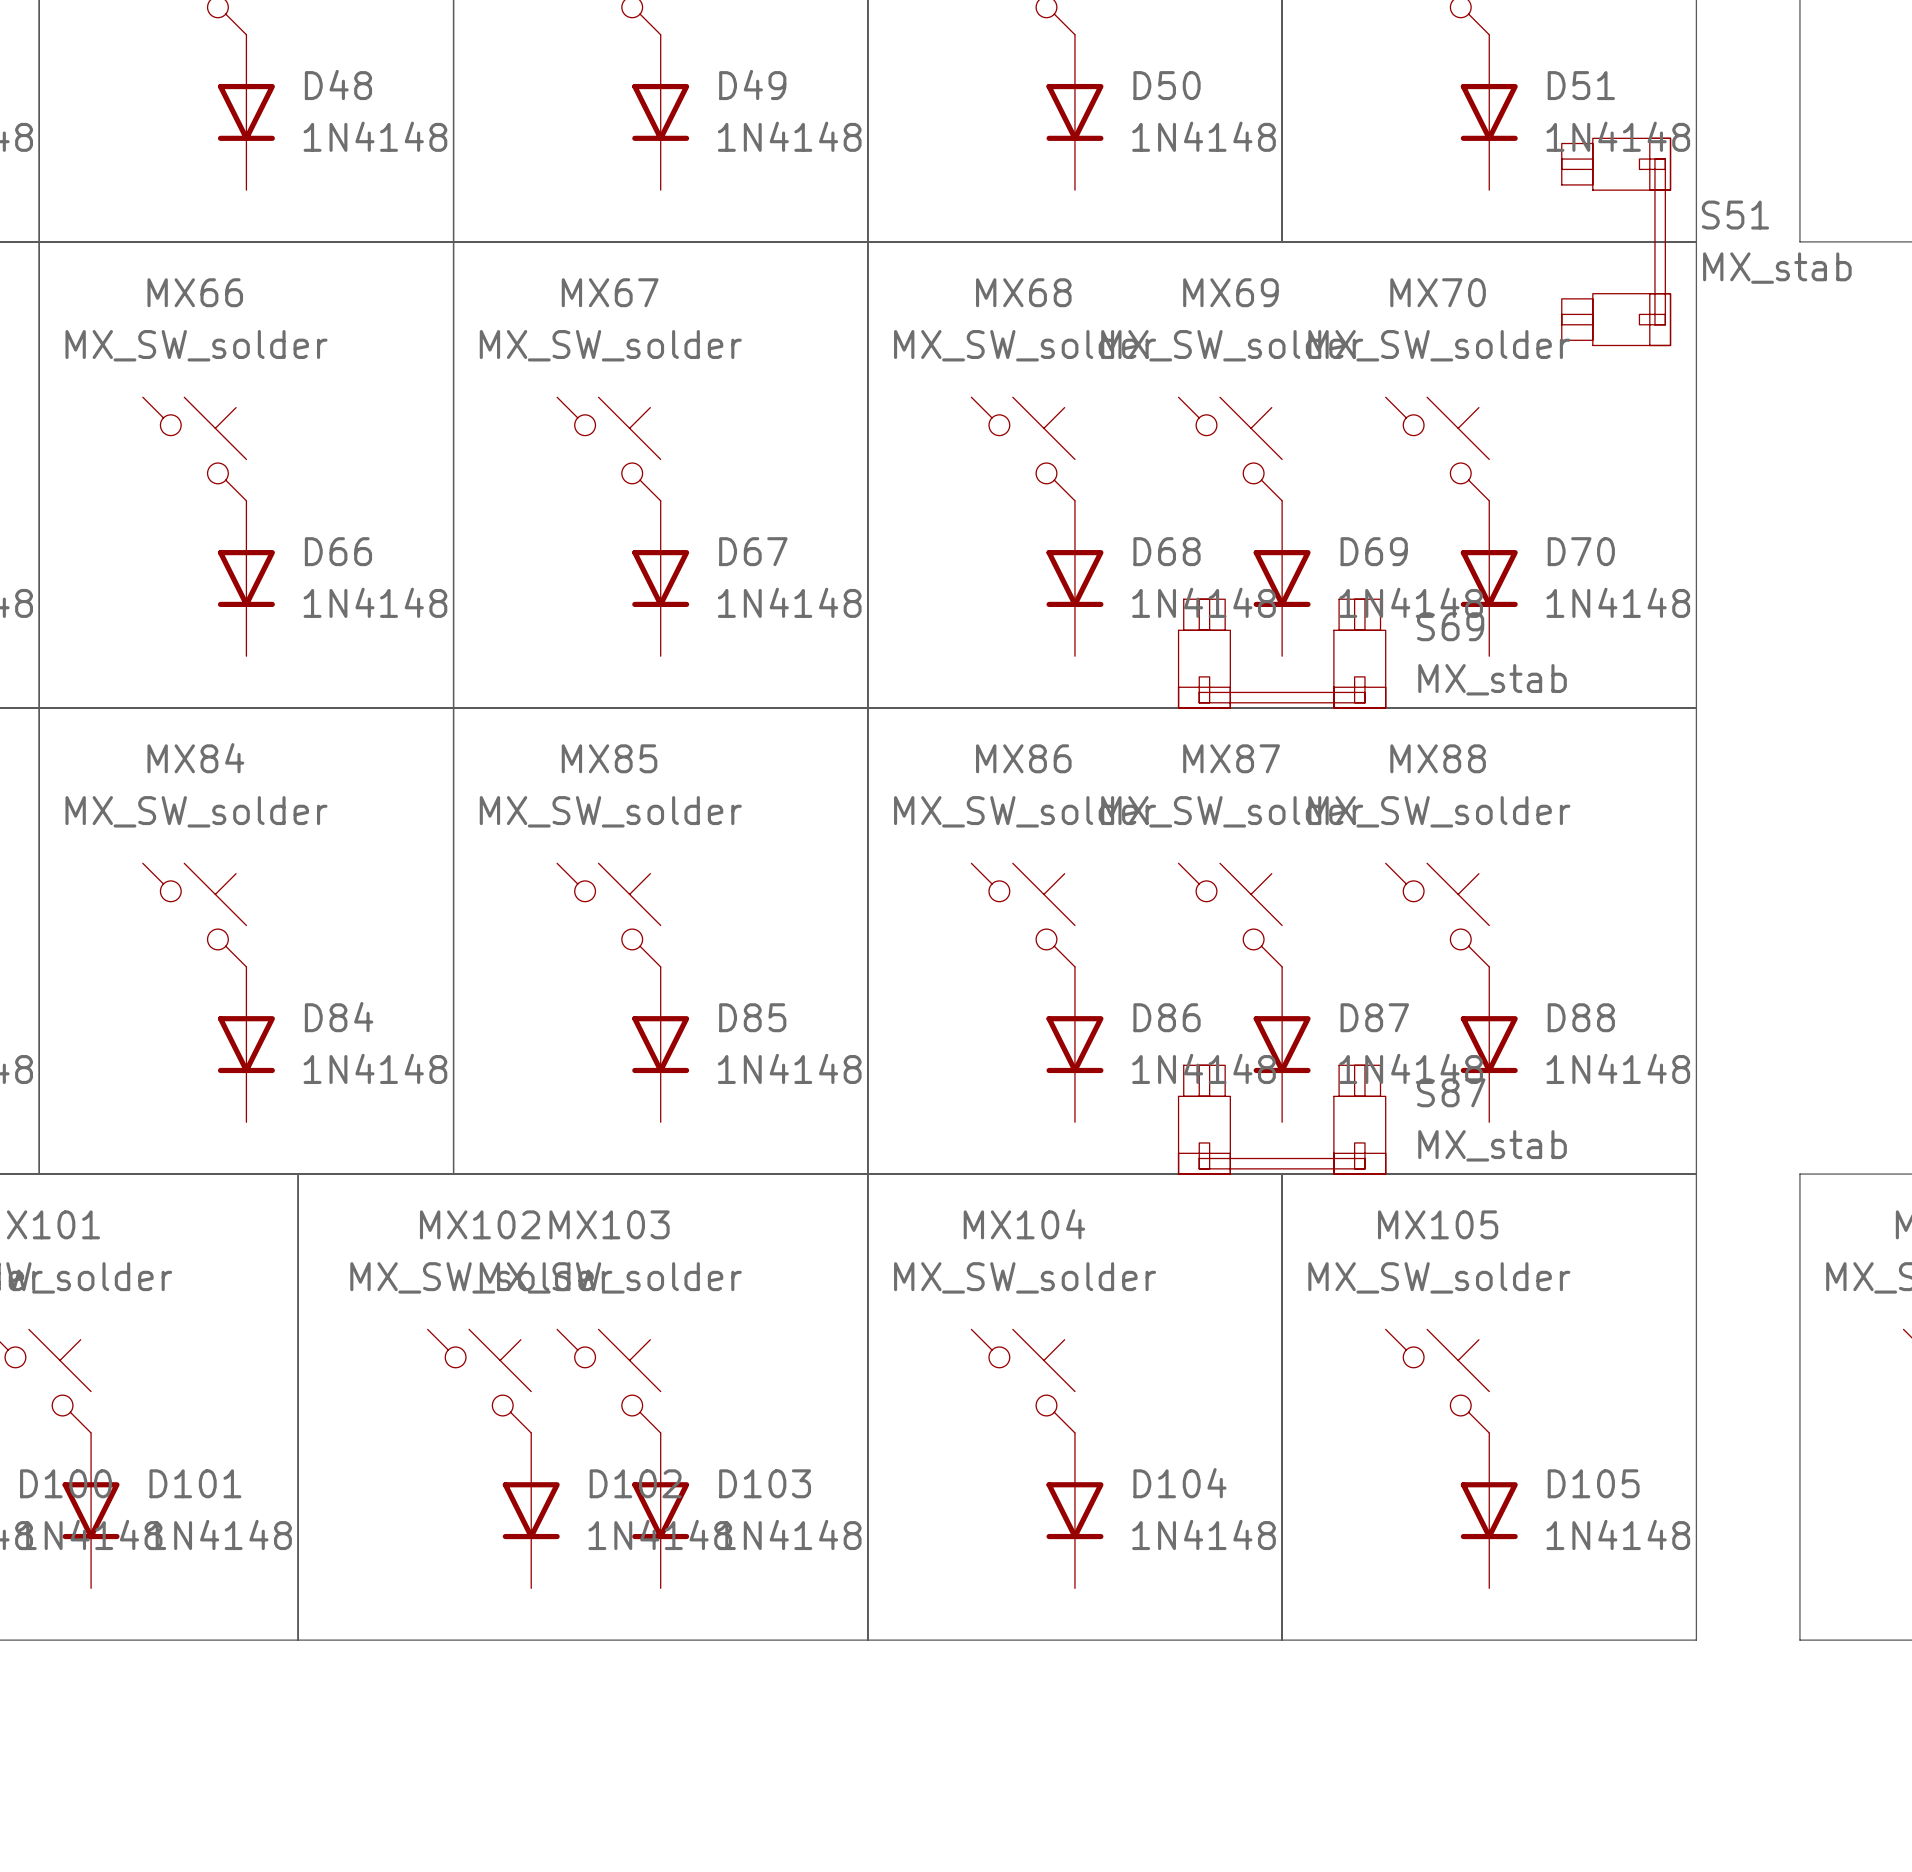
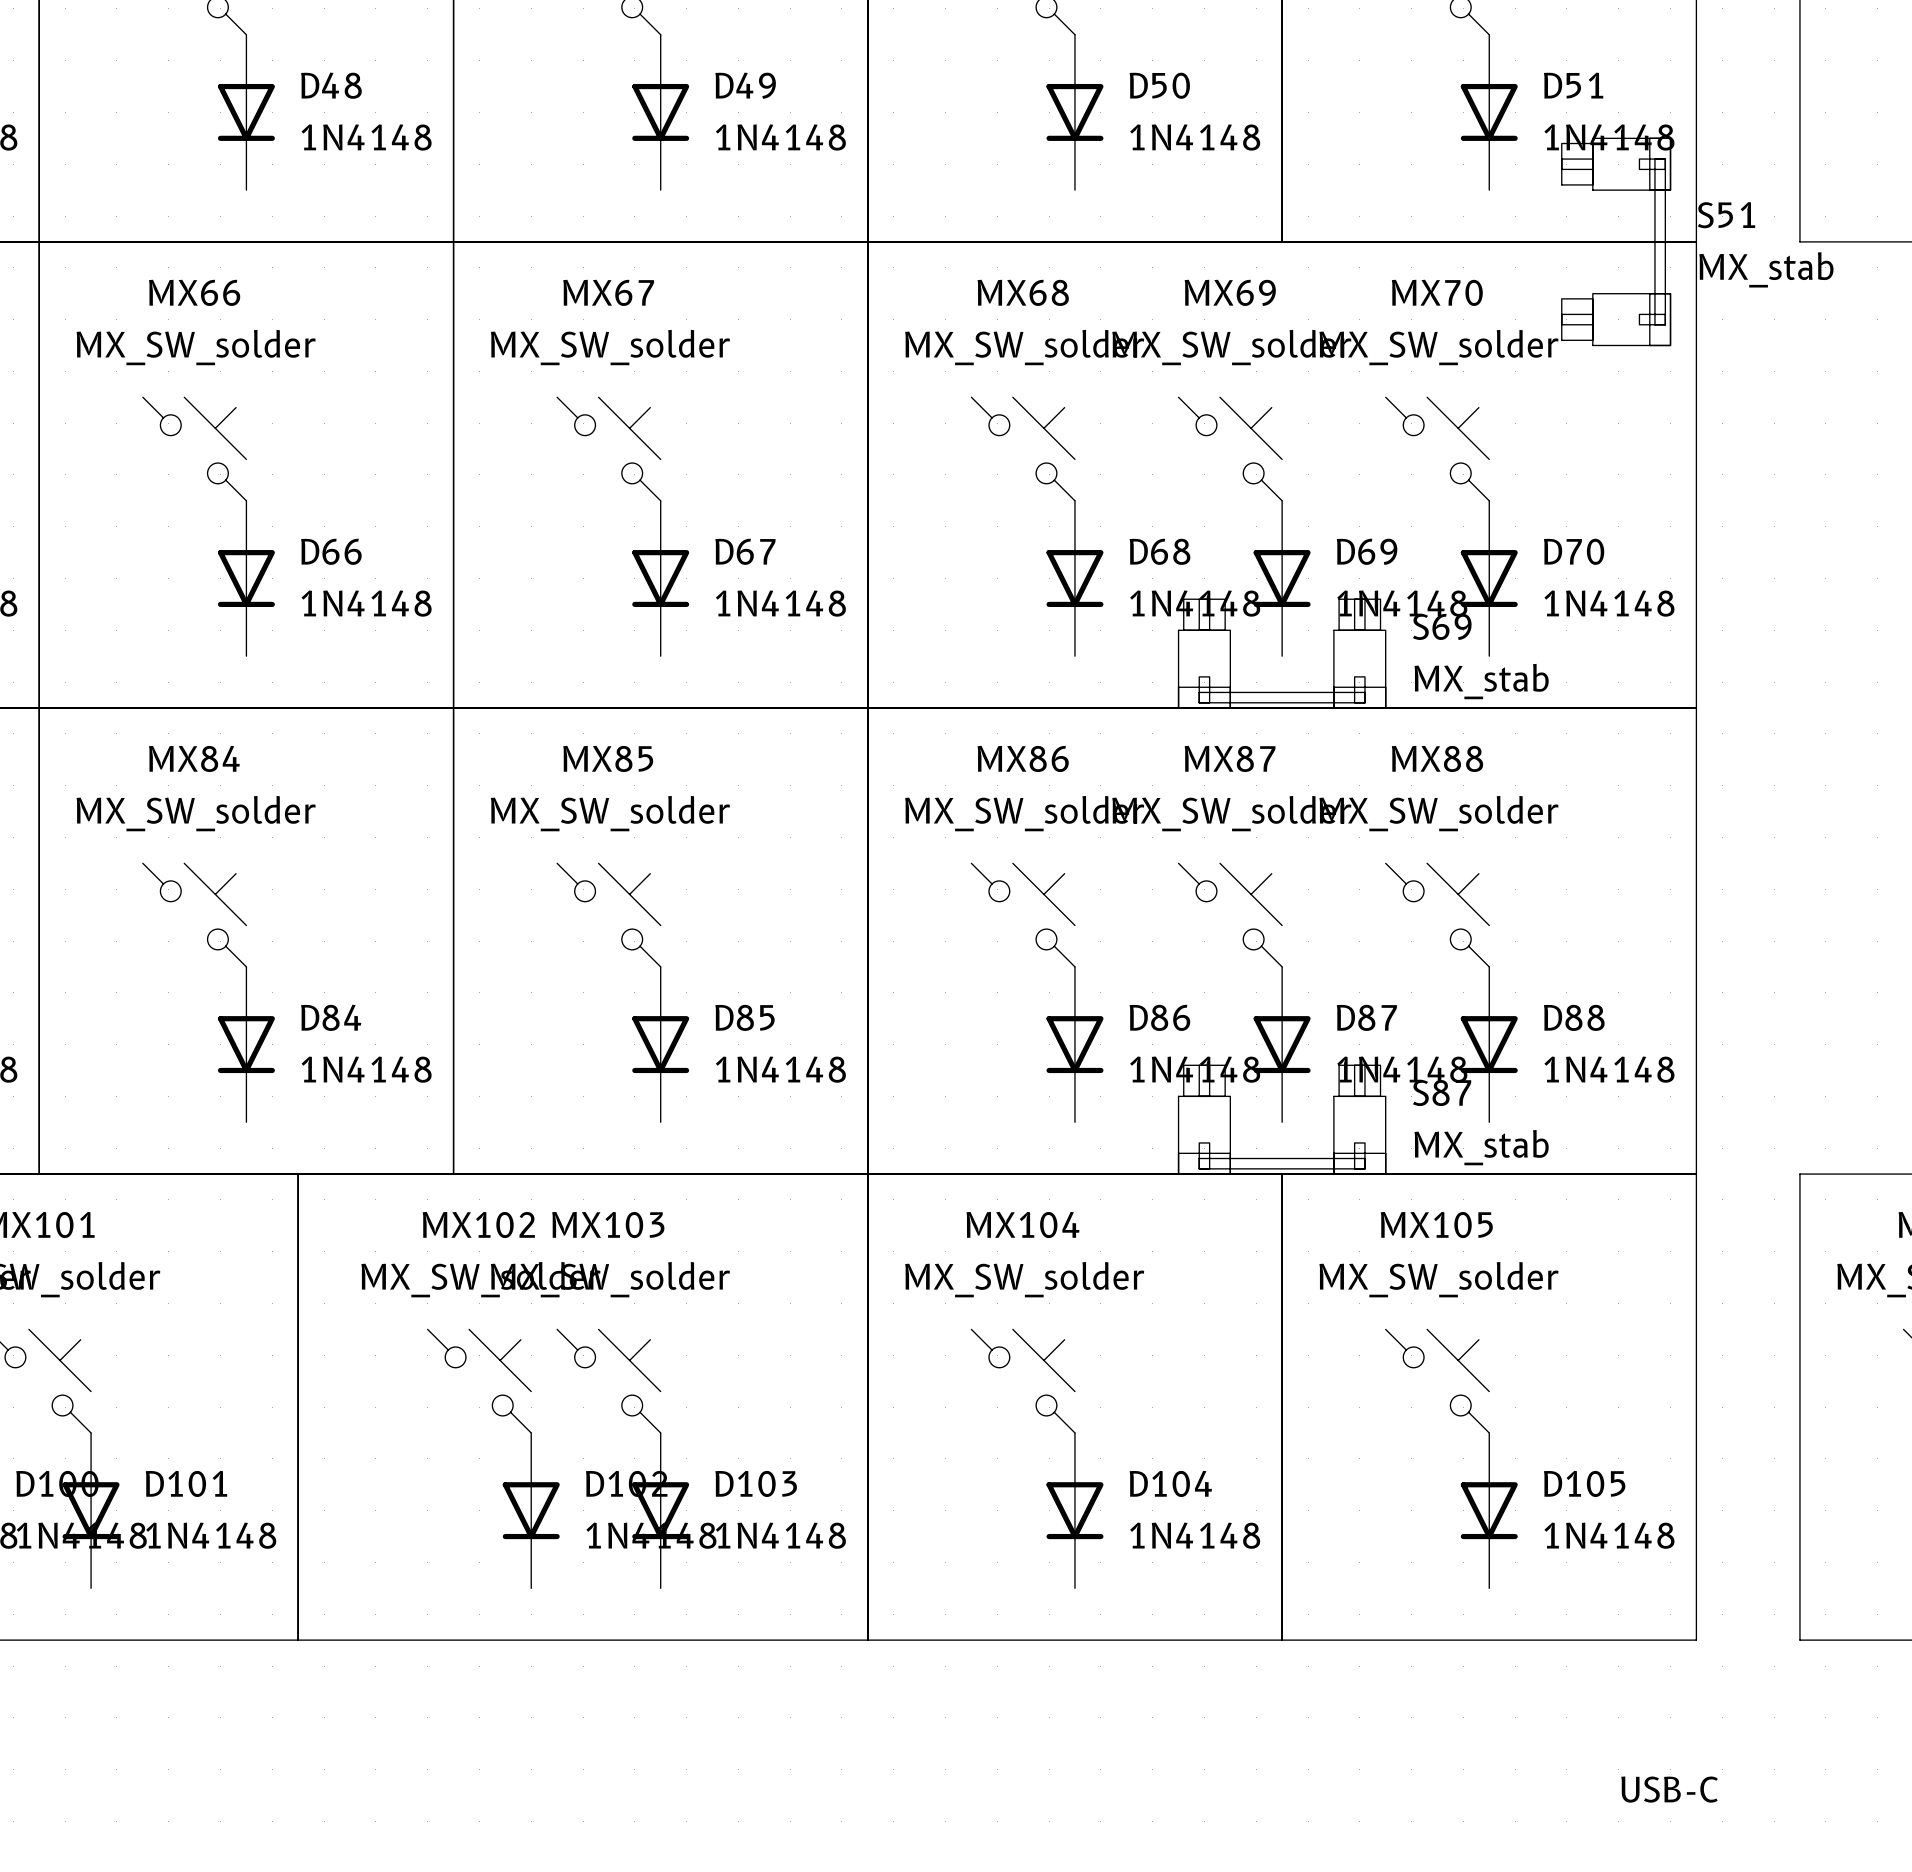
text: none -> USB-C (1669, 1789)

